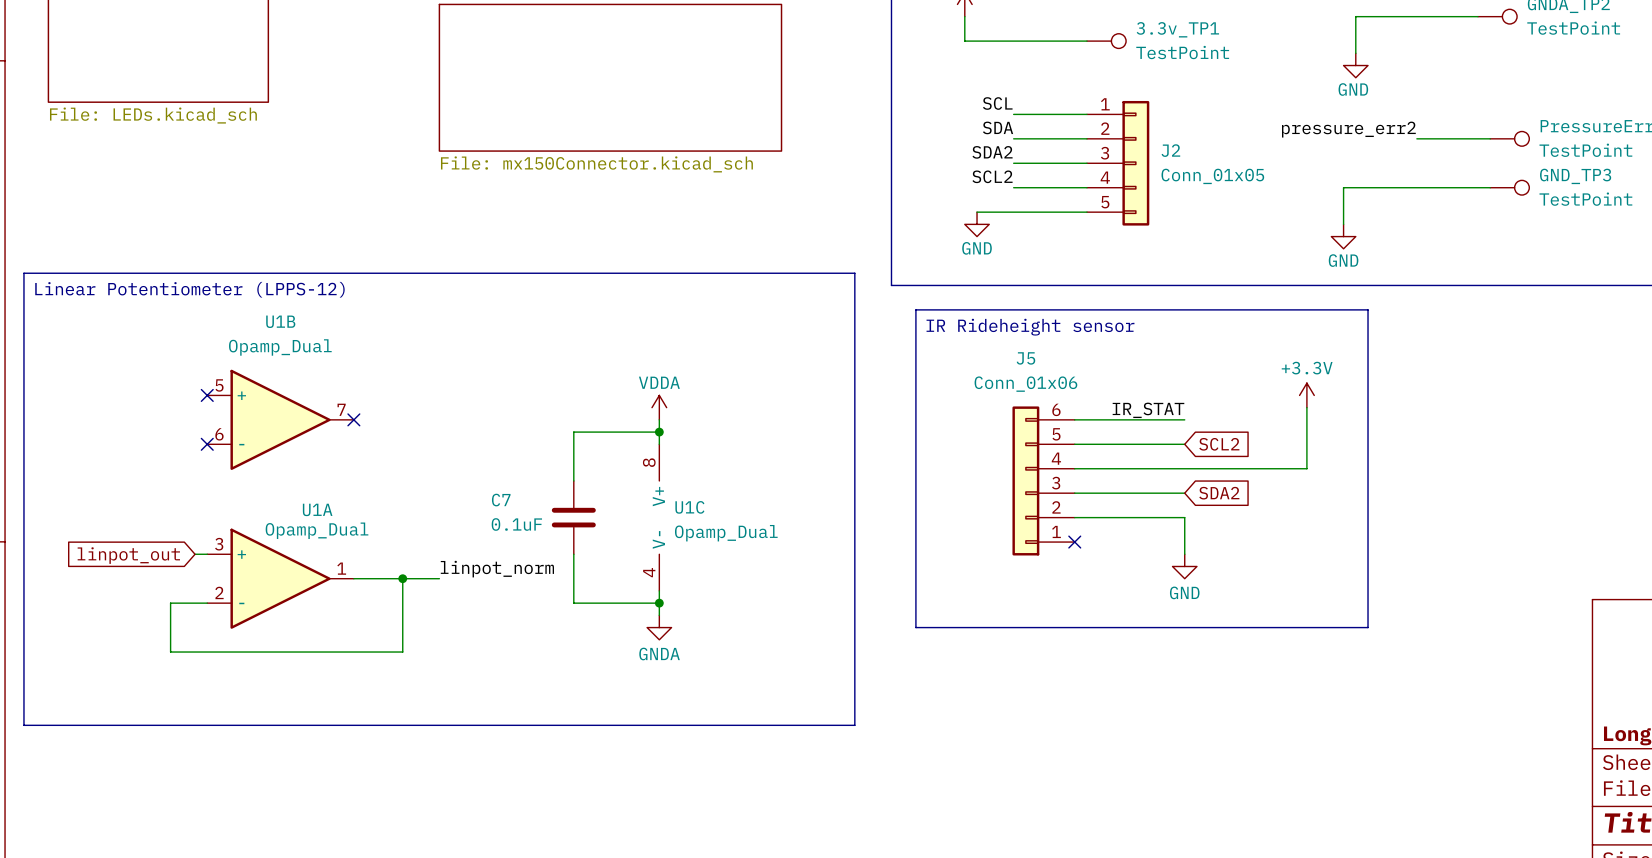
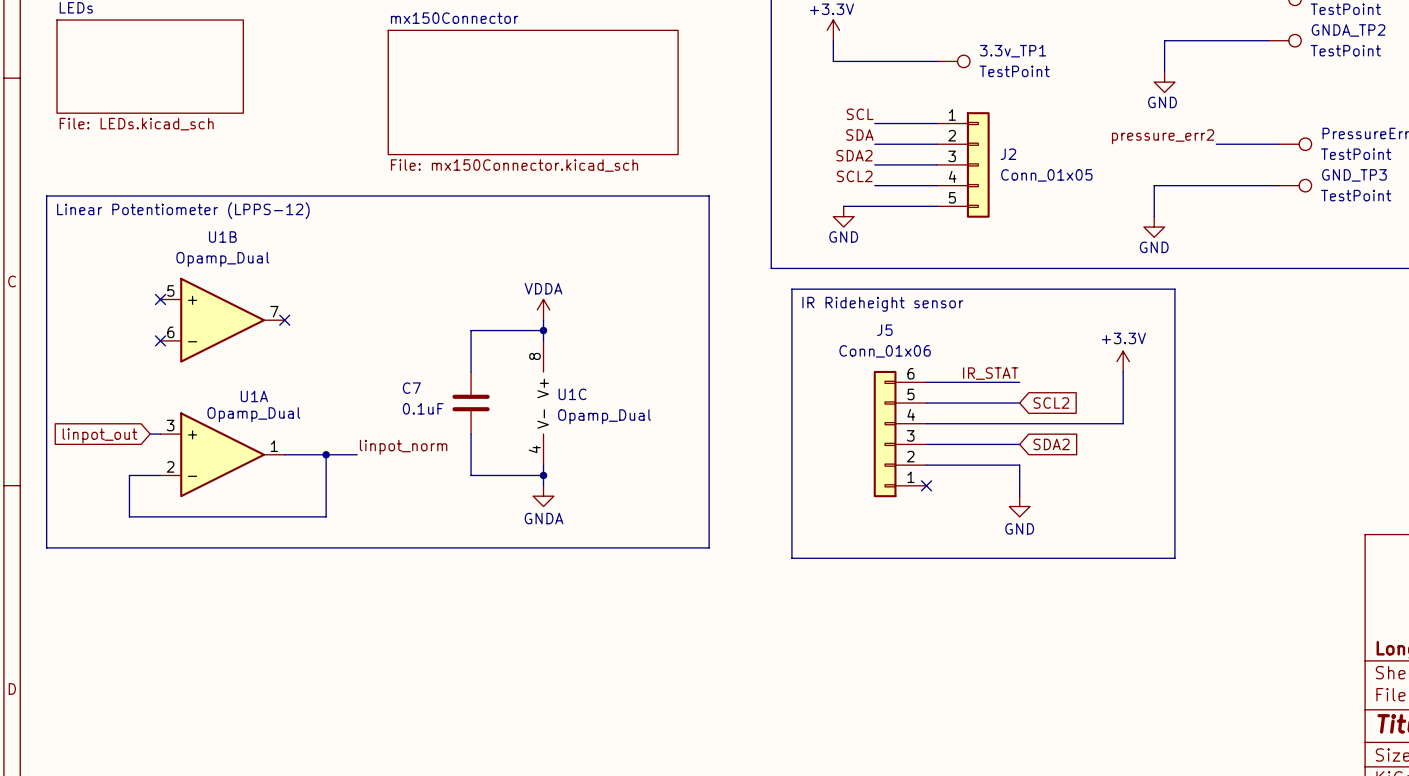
line: (23, 273) (854, 273) (854, 725) (23, 725) (23, 273) -> (46, 195) (46, 547) (709, 547) (709, 195) (46, 195)
text position: Linear Potentiometer (LPPS-12) (189, 289) -> Linear Potentiometer (LPPS-12) (183, 210)
no-connect mark: none -> (160, 299)
no-connect mark: none -> (284, 320)
junction: none -> (543, 330)
no-connect mark: none -> (160, 340)
no-connect mark: (207, 395) -> none
power symbol position: VDDA (659, 407) -> VDDA (543, 309)
U1B position: (280, 419) -> (222, 320)
no-connect mark: (353, 419) -> none
wire: (659, 419) (659, 444) -> (543, 320) (543, 340)
wire: (659, 432) (573, 432) (573, 480) -> (543, 330) (471, 330) (471, 371)
junction: (659, 432) -> none
no-connect mark: (207, 444) -> none
wire: none -> (284, 454) (357, 454)
junction: none -> (326, 454)
C7 position: (573, 517) -> (471, 403)
U1C position: (659, 517) -> (543, 403)
wire: none -> (160, 475) (129, 475) (129, 516) (315, 516)
junction: none -> (543, 475)
wire: (195, 554) (207, 554) -> (150, 434) (160, 434)
wire: (573, 554) (573, 603) (659, 603) -> (471, 434) (471, 475) (543, 475)
global label position: linpot_out (128, 555) -> linpot_out (99, 435)
label position: linpot_norm (497, 569) -> linpot_norm (403, 447)
U1A position: (280, 578) -> (222, 454)
wire: (366, 578) (439, 578) -> (326, 516) (326, 454)
wire: (402, 578) (402, 652) (170, 652) (170, 603) (207, 603) -> none
junction: (402, 578) -> none
wire: (659, 590) (659, 615) -> (543, 465) (543, 485)
junction: (659, 603) -> none
power symbol position: GNDA (659, 627) -> GNDA (543, 496)

